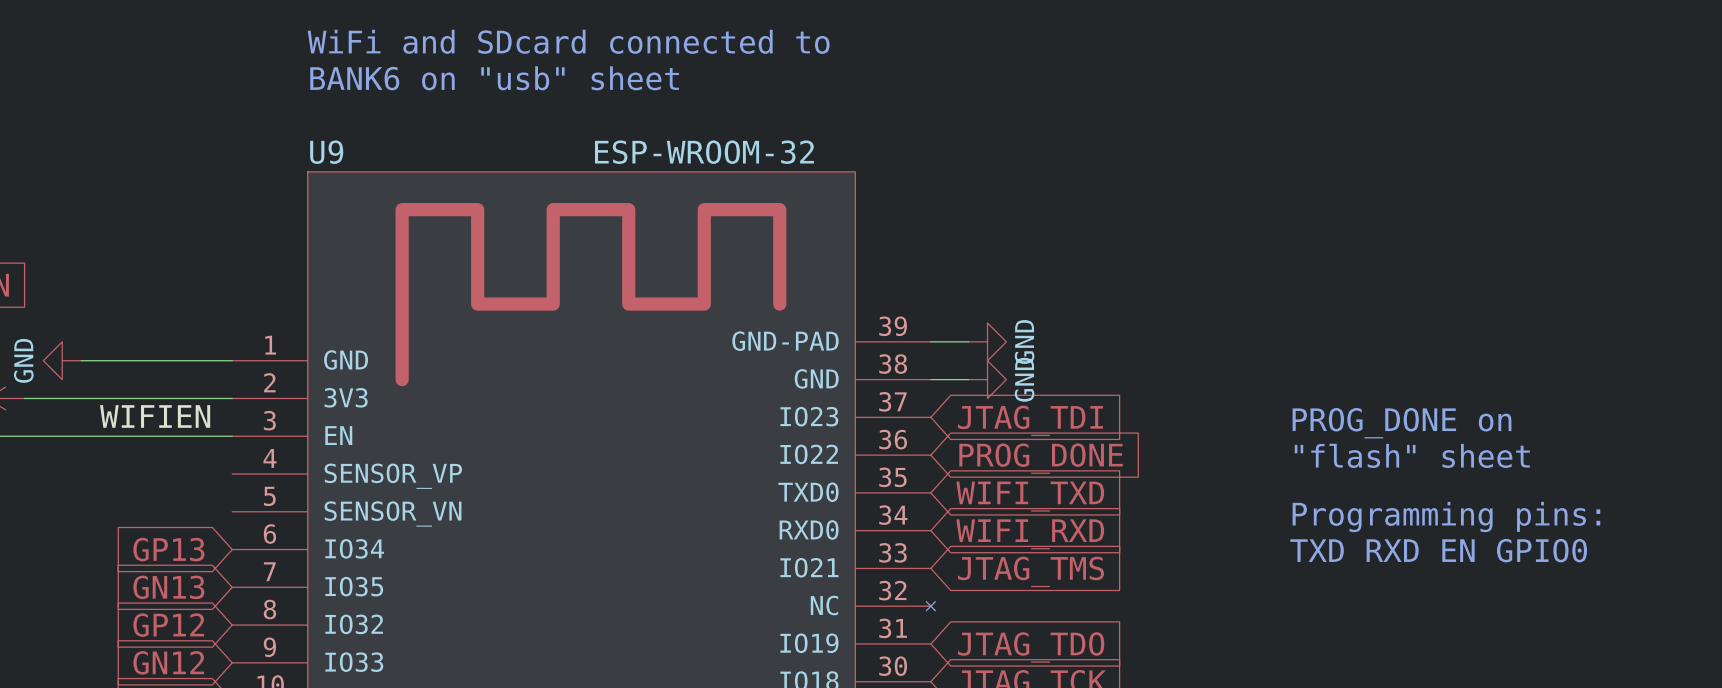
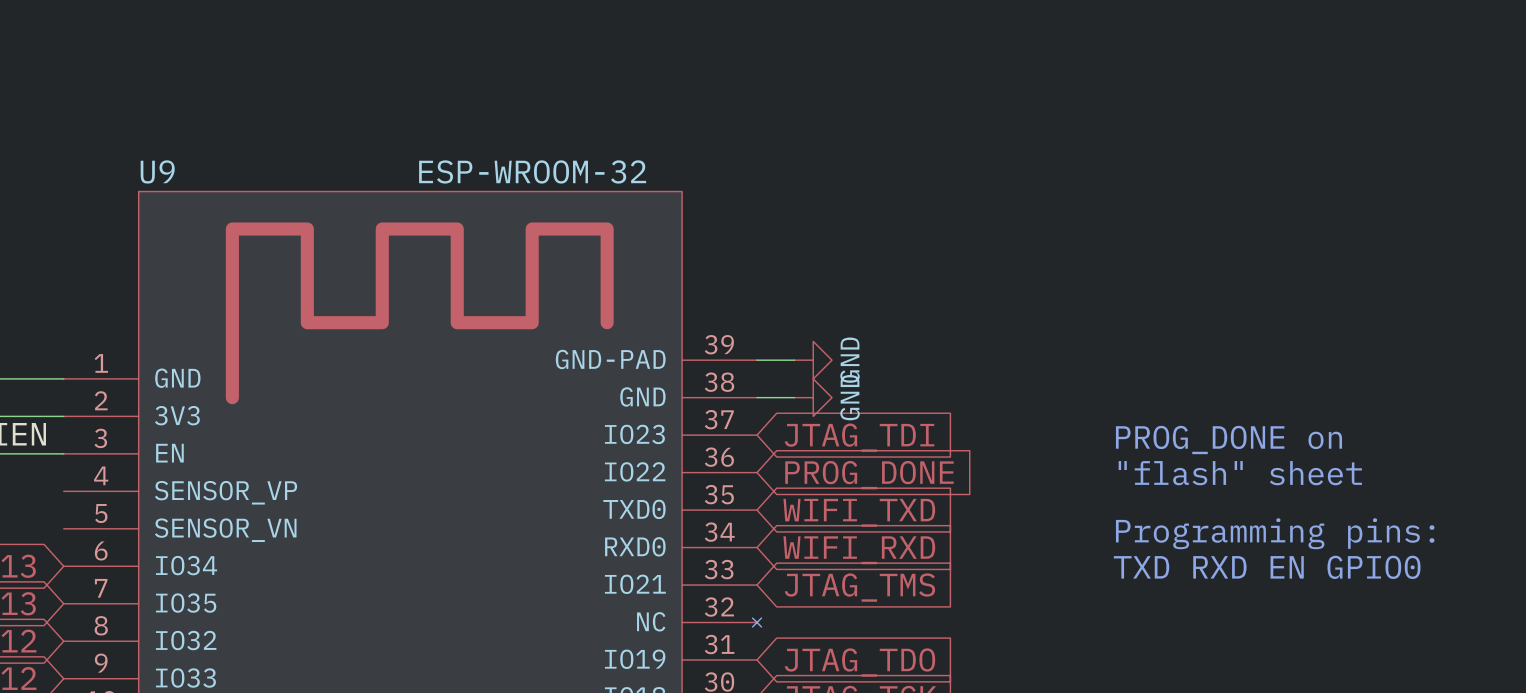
text: WiFi and SDcard connected to (568, 41) -> none
text: BANK6 on "usb" sheet (494, 78) -> none

